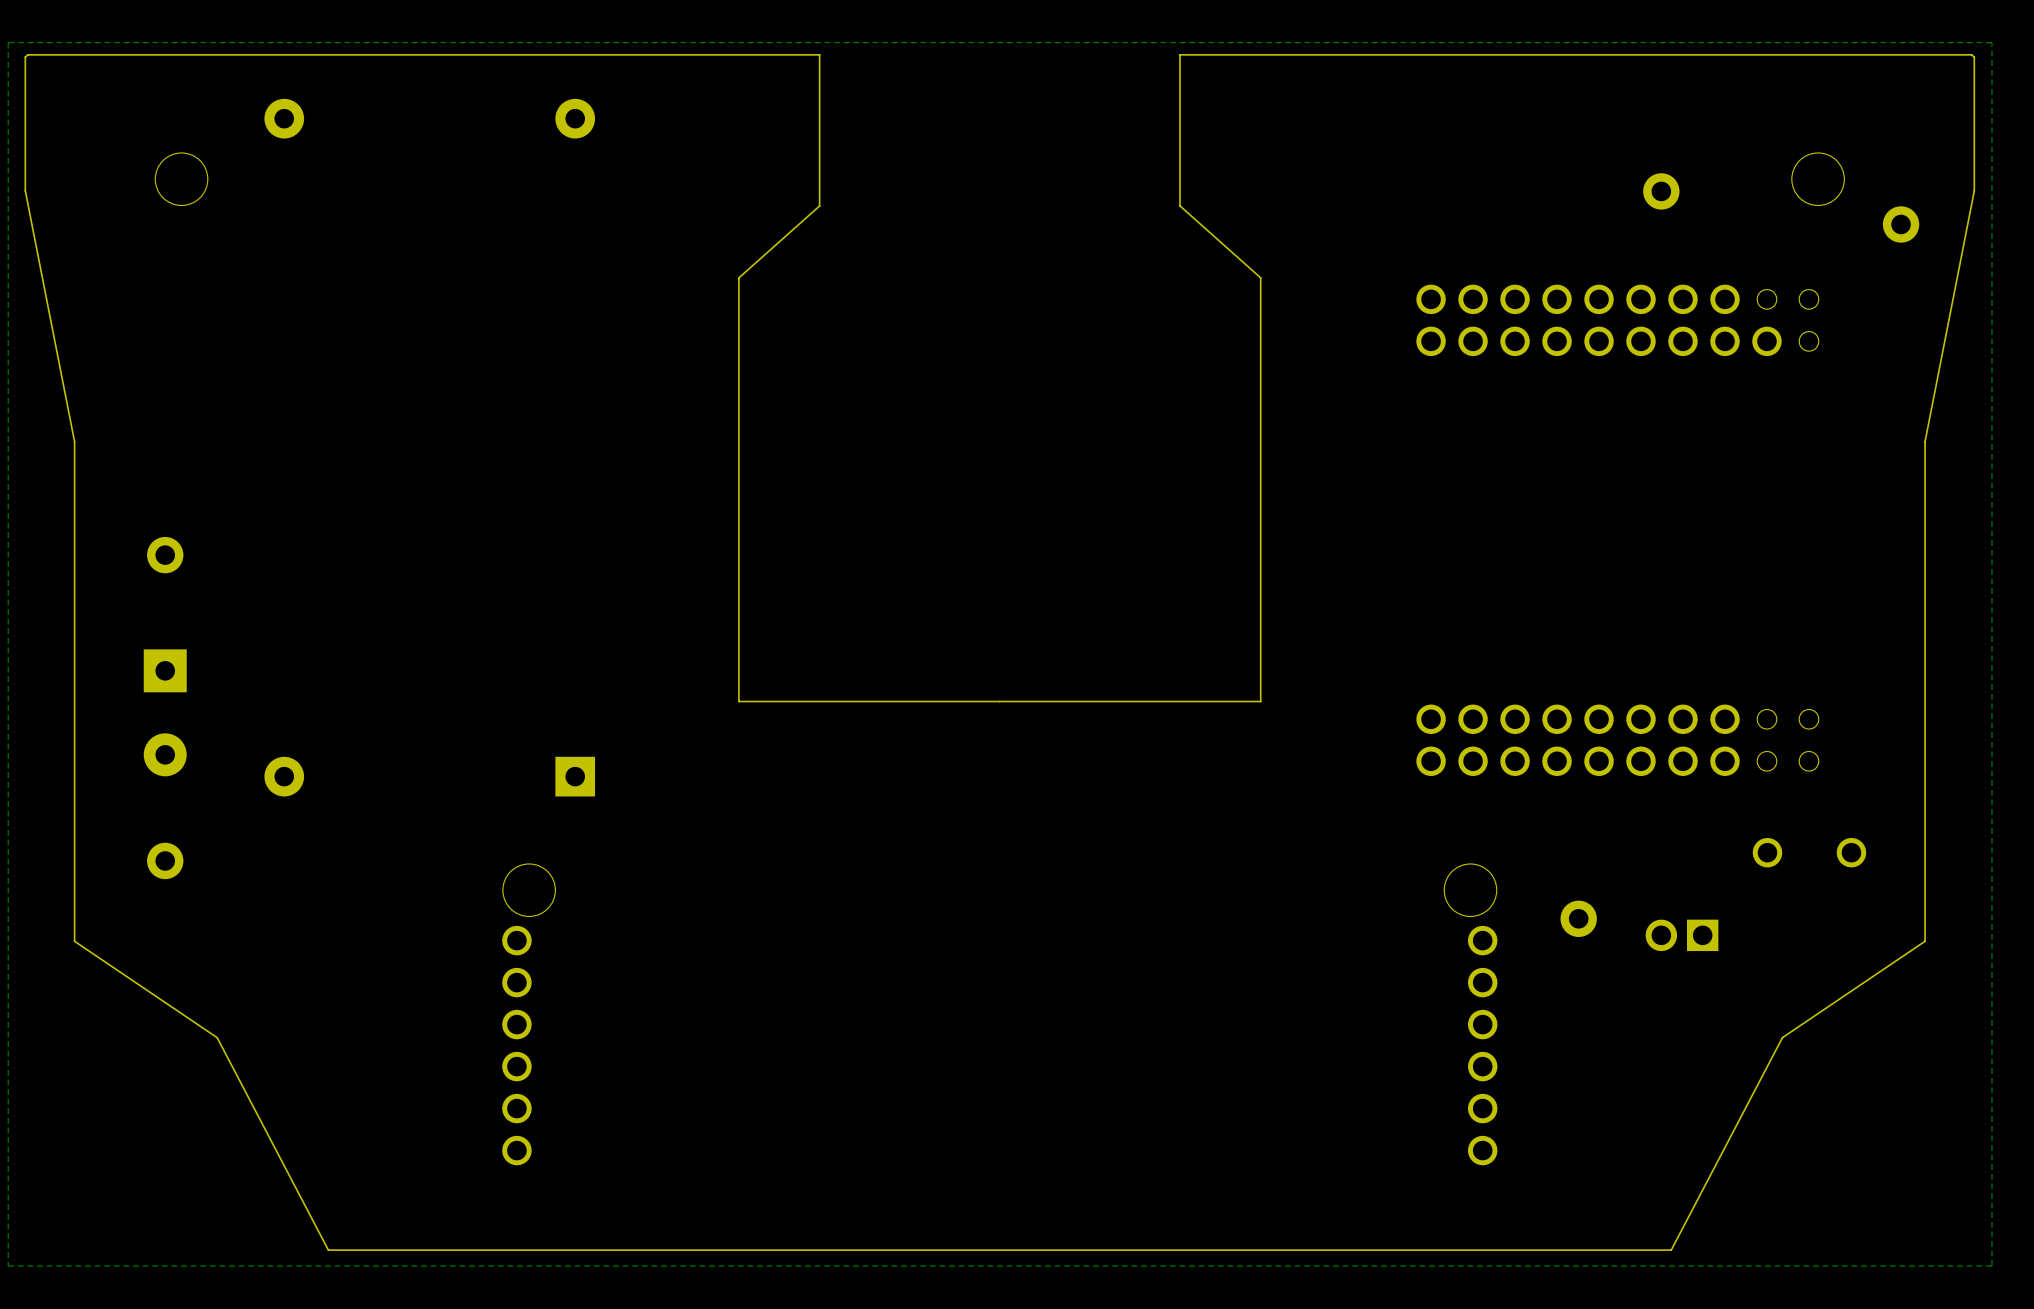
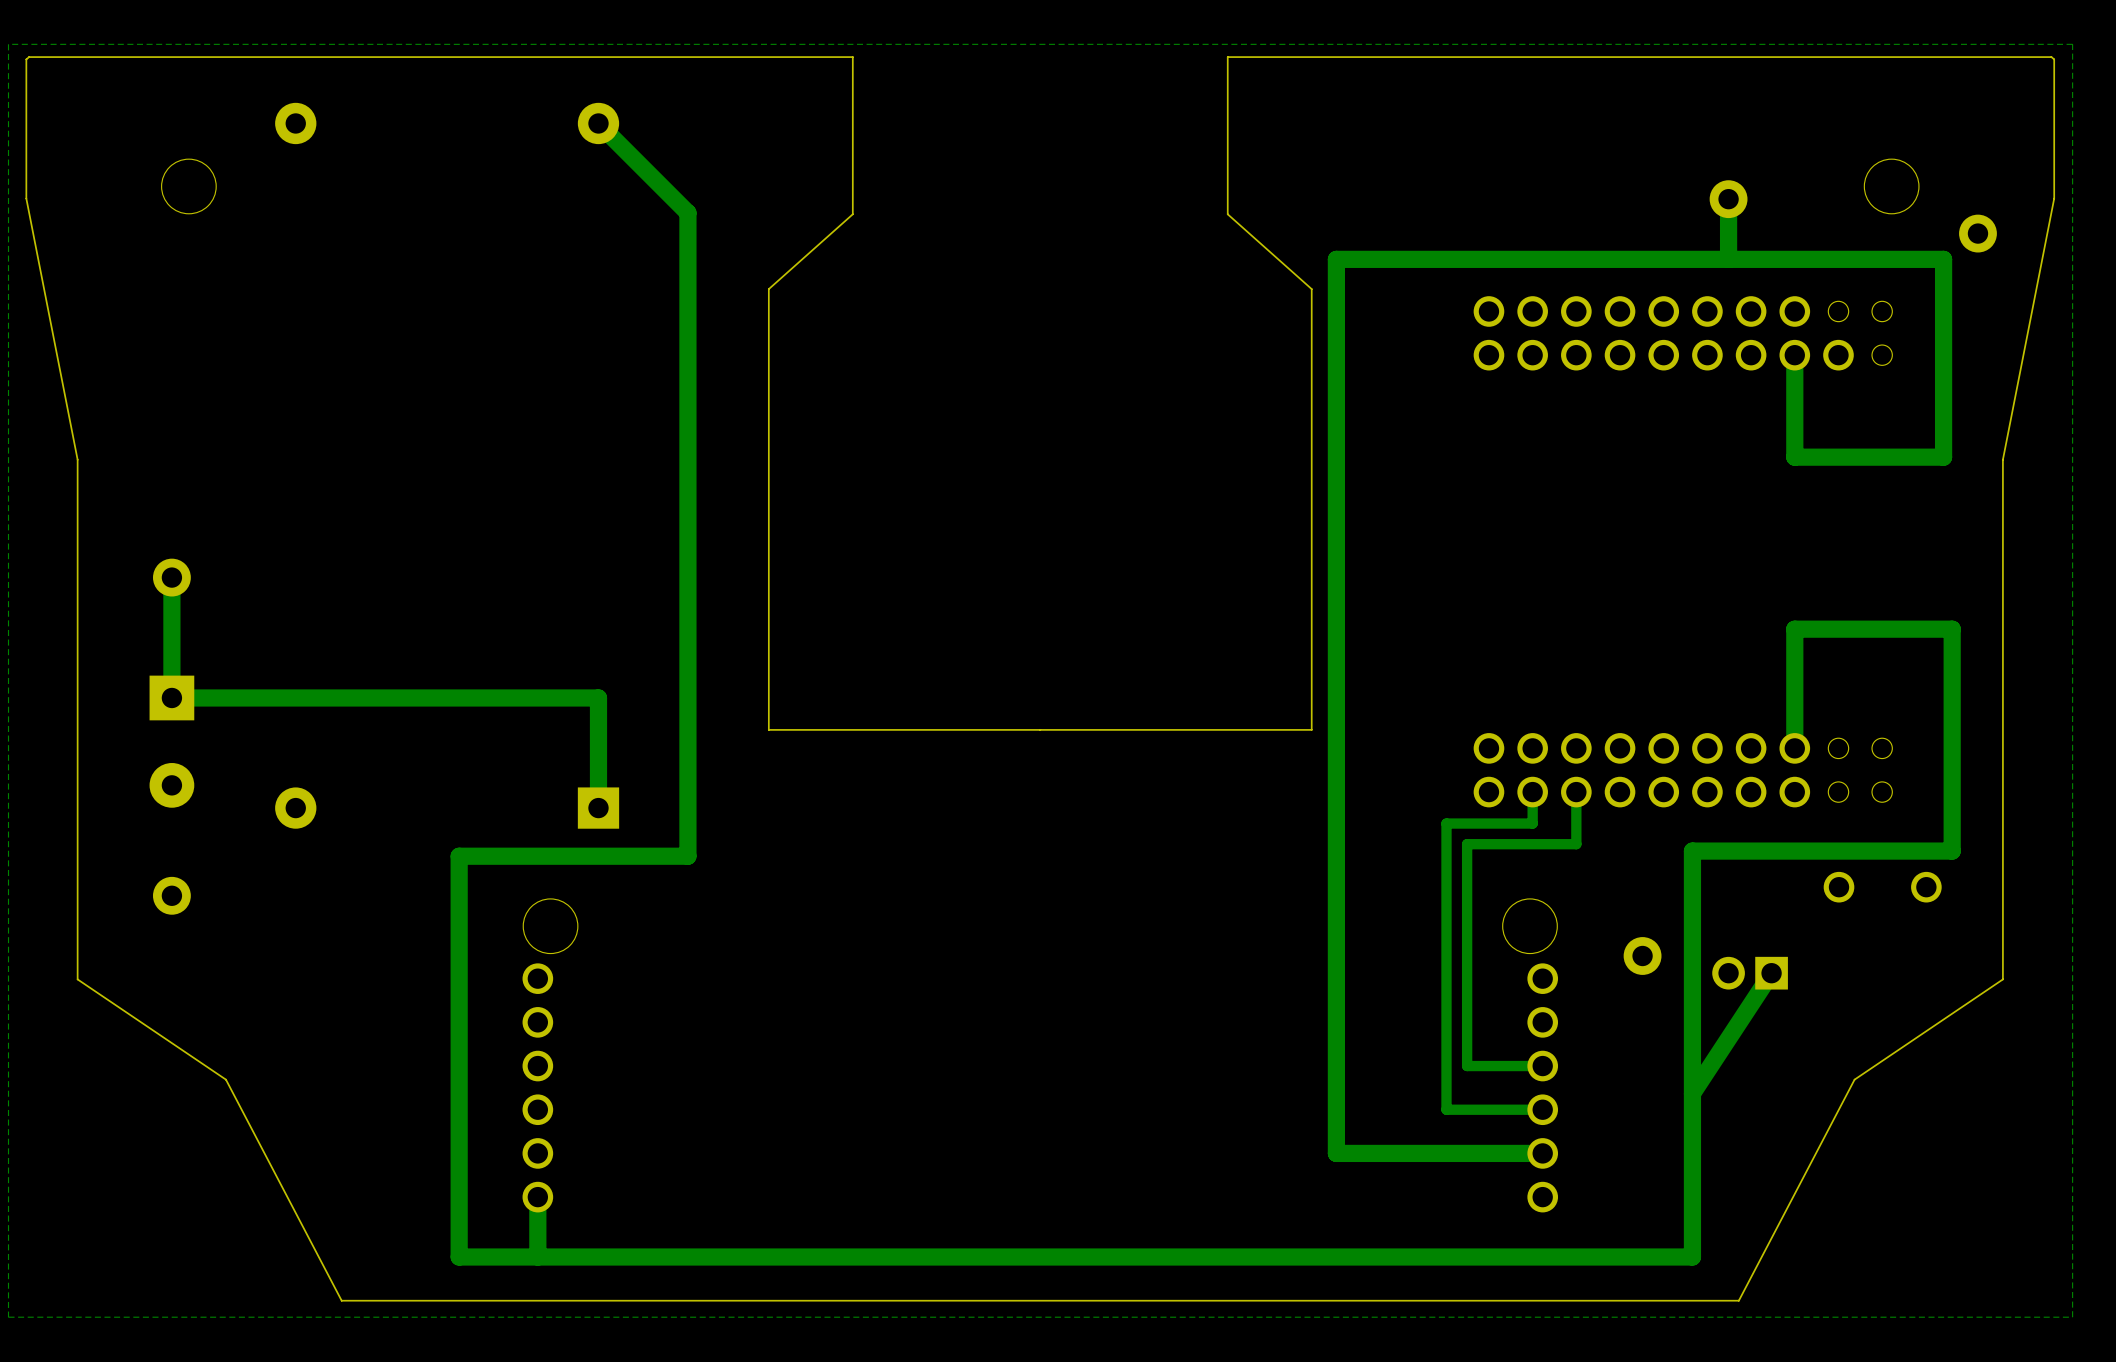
bottom track: none -> (598, 123) (687, 212) (687, 856) (459, 856) (459, 1257) (1692, 1257) (1692, 851) (1952, 851) (1952, 629) (1794, 629) (1794, 748)
bottom track: none -> (1728, 199) (1728, 259)
bottom track: none -> (1794, 355) (1794, 457) (1943, 457) (1943, 259) (1336, 259) (1336, 1153) (1542, 1153)
bottom track: none -> (171, 577) (171, 697) (598, 697) (598, 808)
bottom track: none -> (1532, 792) (1532, 823) (1446, 823) (1446, 1109) (1542, 1109)
bottom track: none -> (1576, 792) (1576, 844) (1467, 844) (1467, 1066) (1542, 1066)
bottom track: none -> (1771, 973) (1692, 1093)
bottom track: none -> (537, 1197) (537, 1257)

